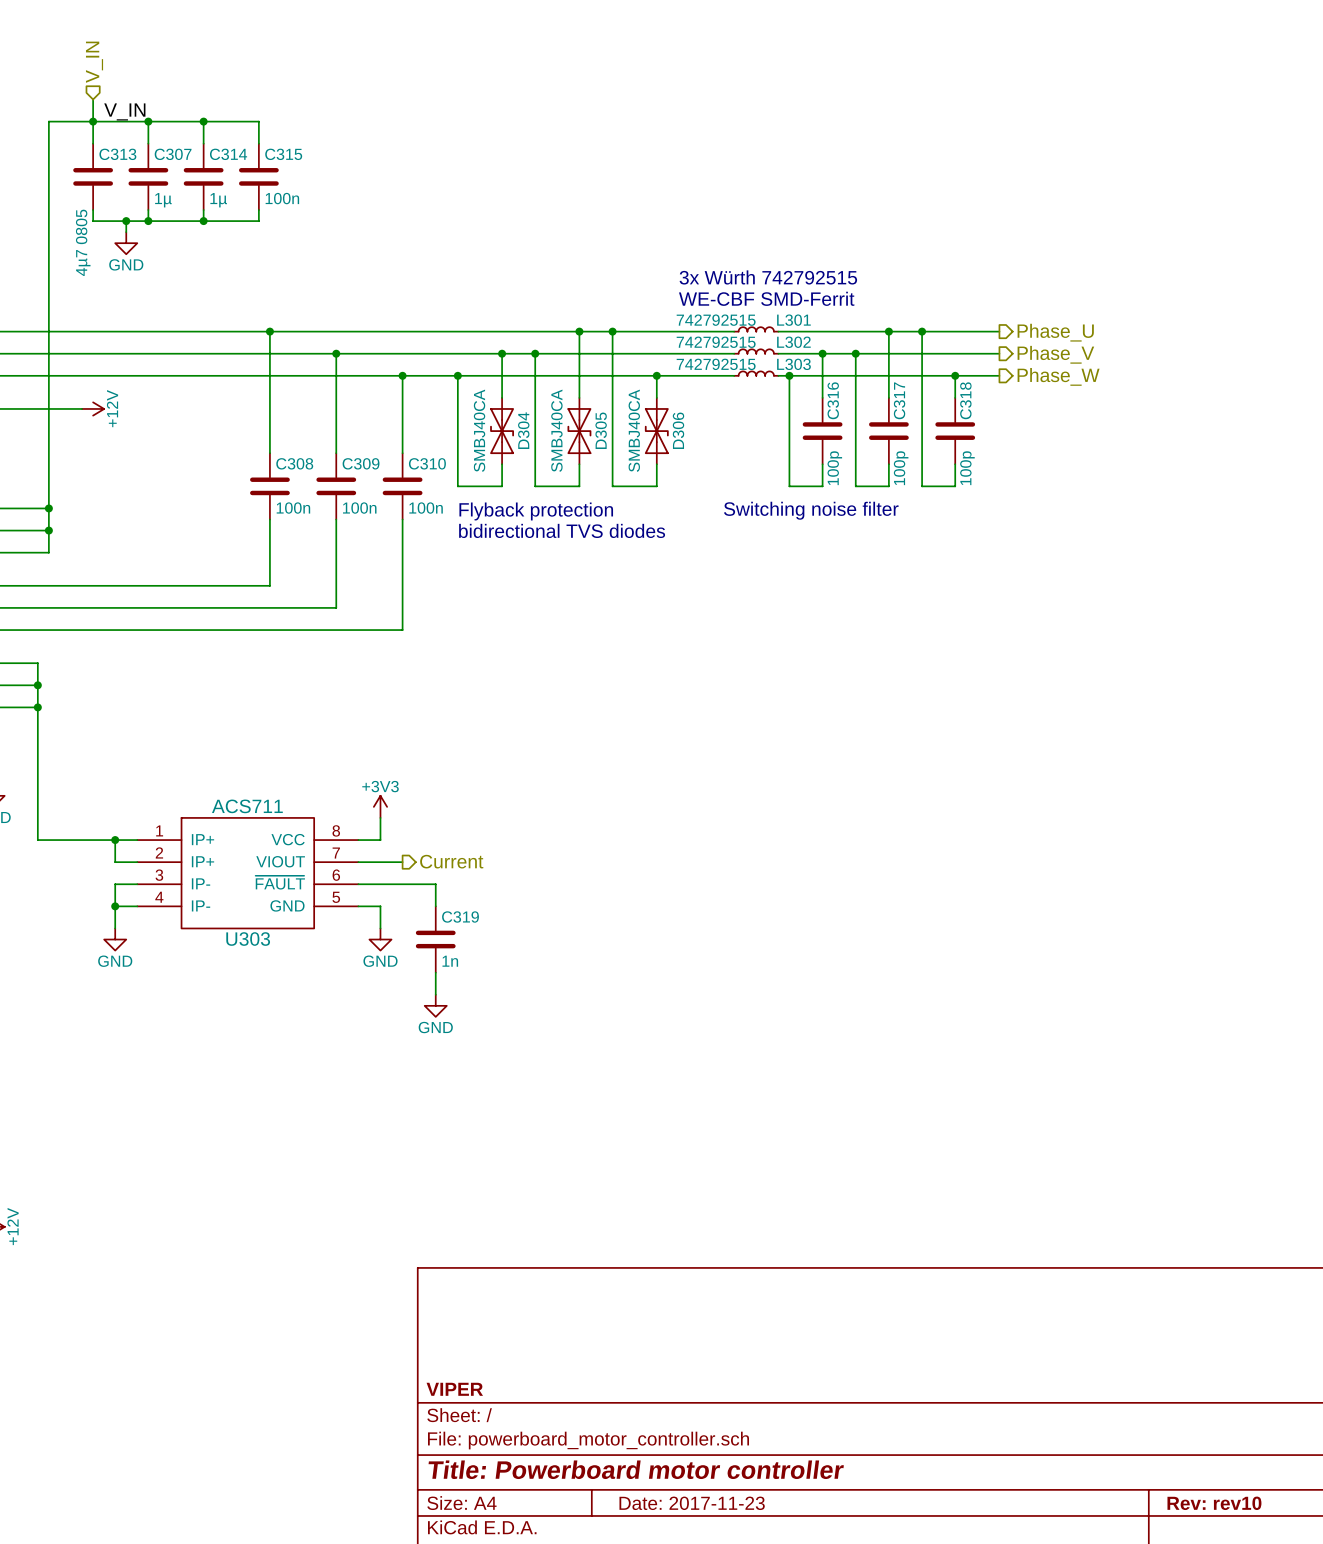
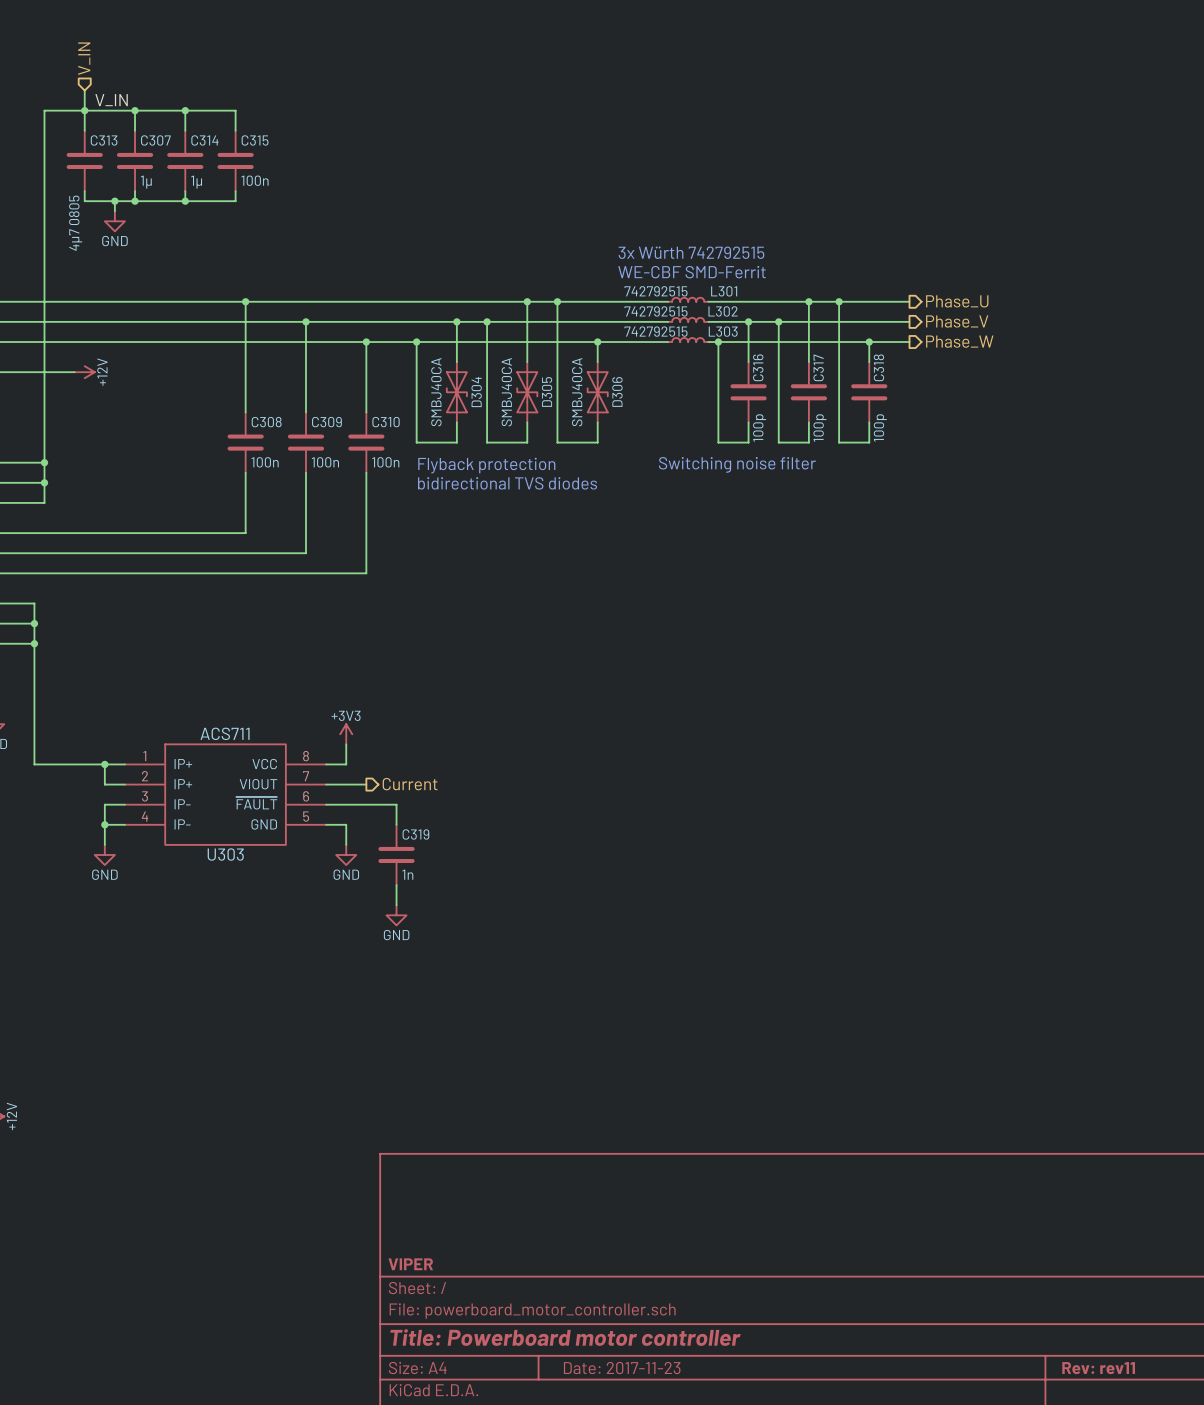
title block: Rev: rev10 (1214, 1503) -> Rev: rev11 (1098, 1368)

